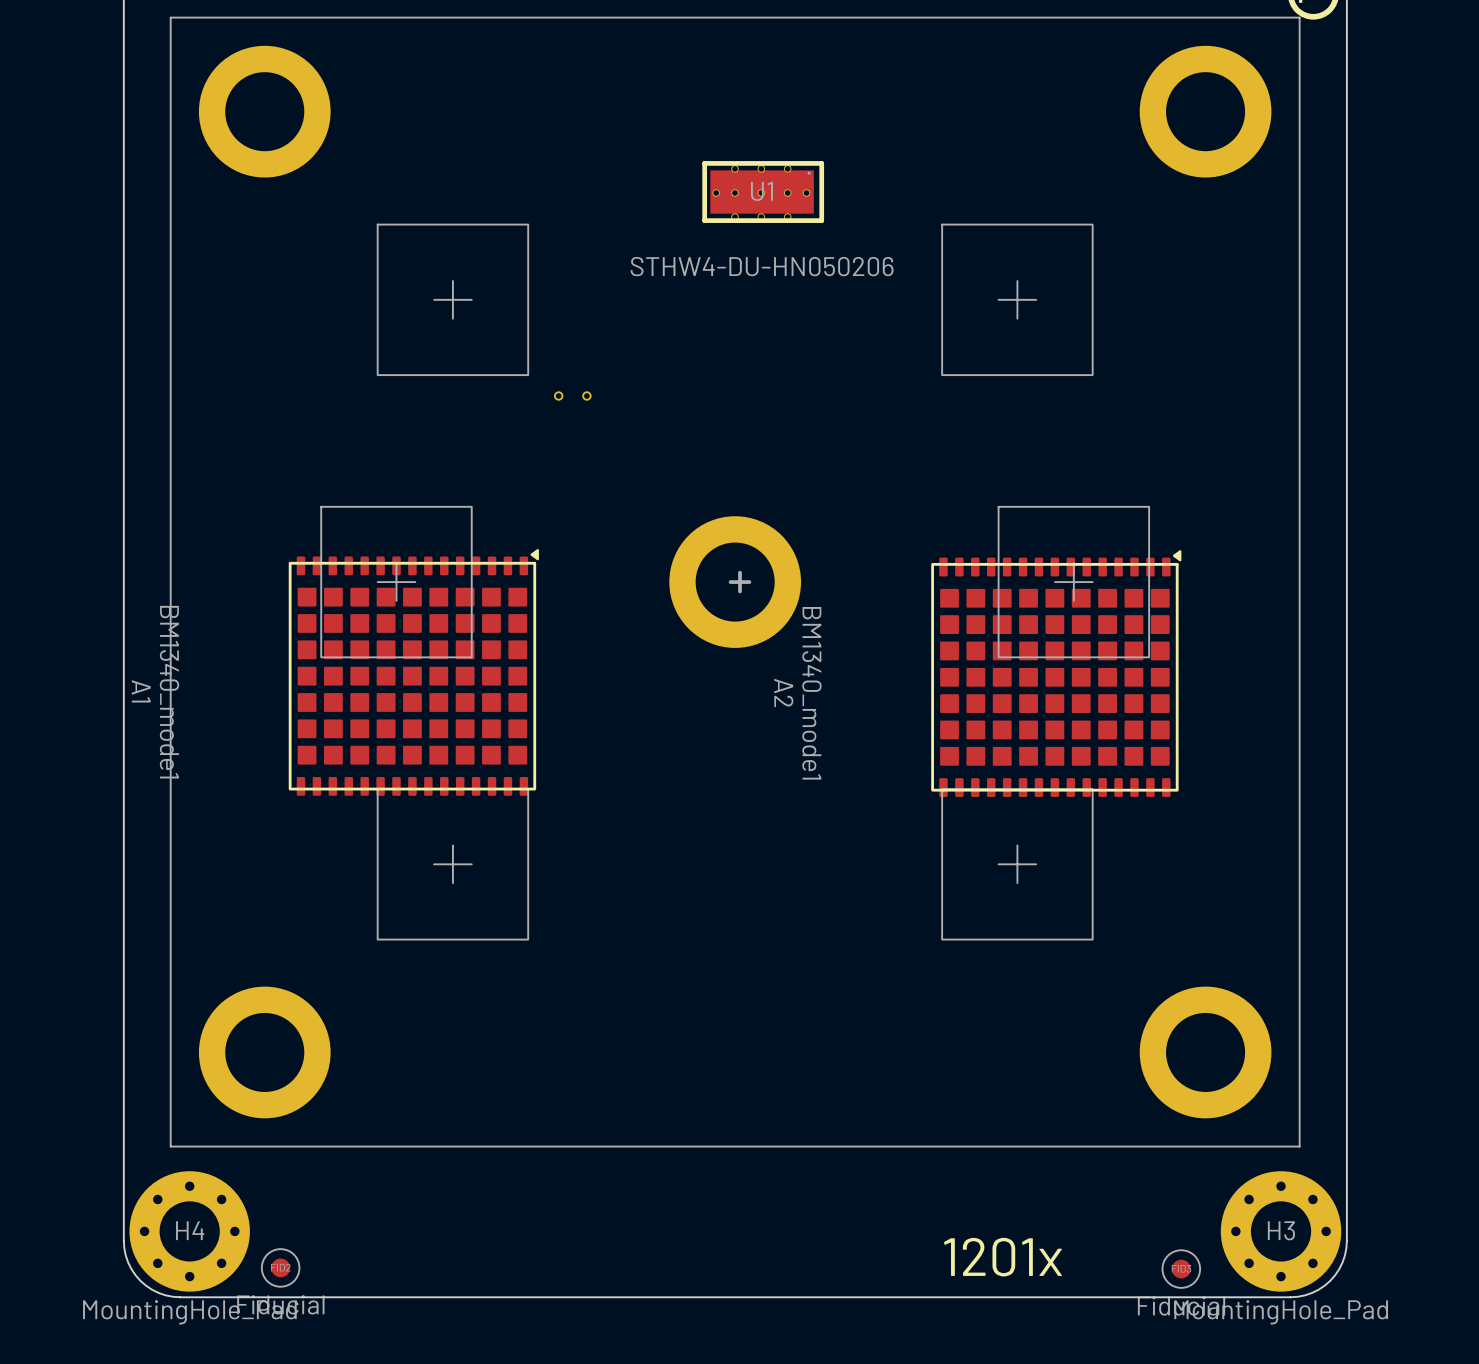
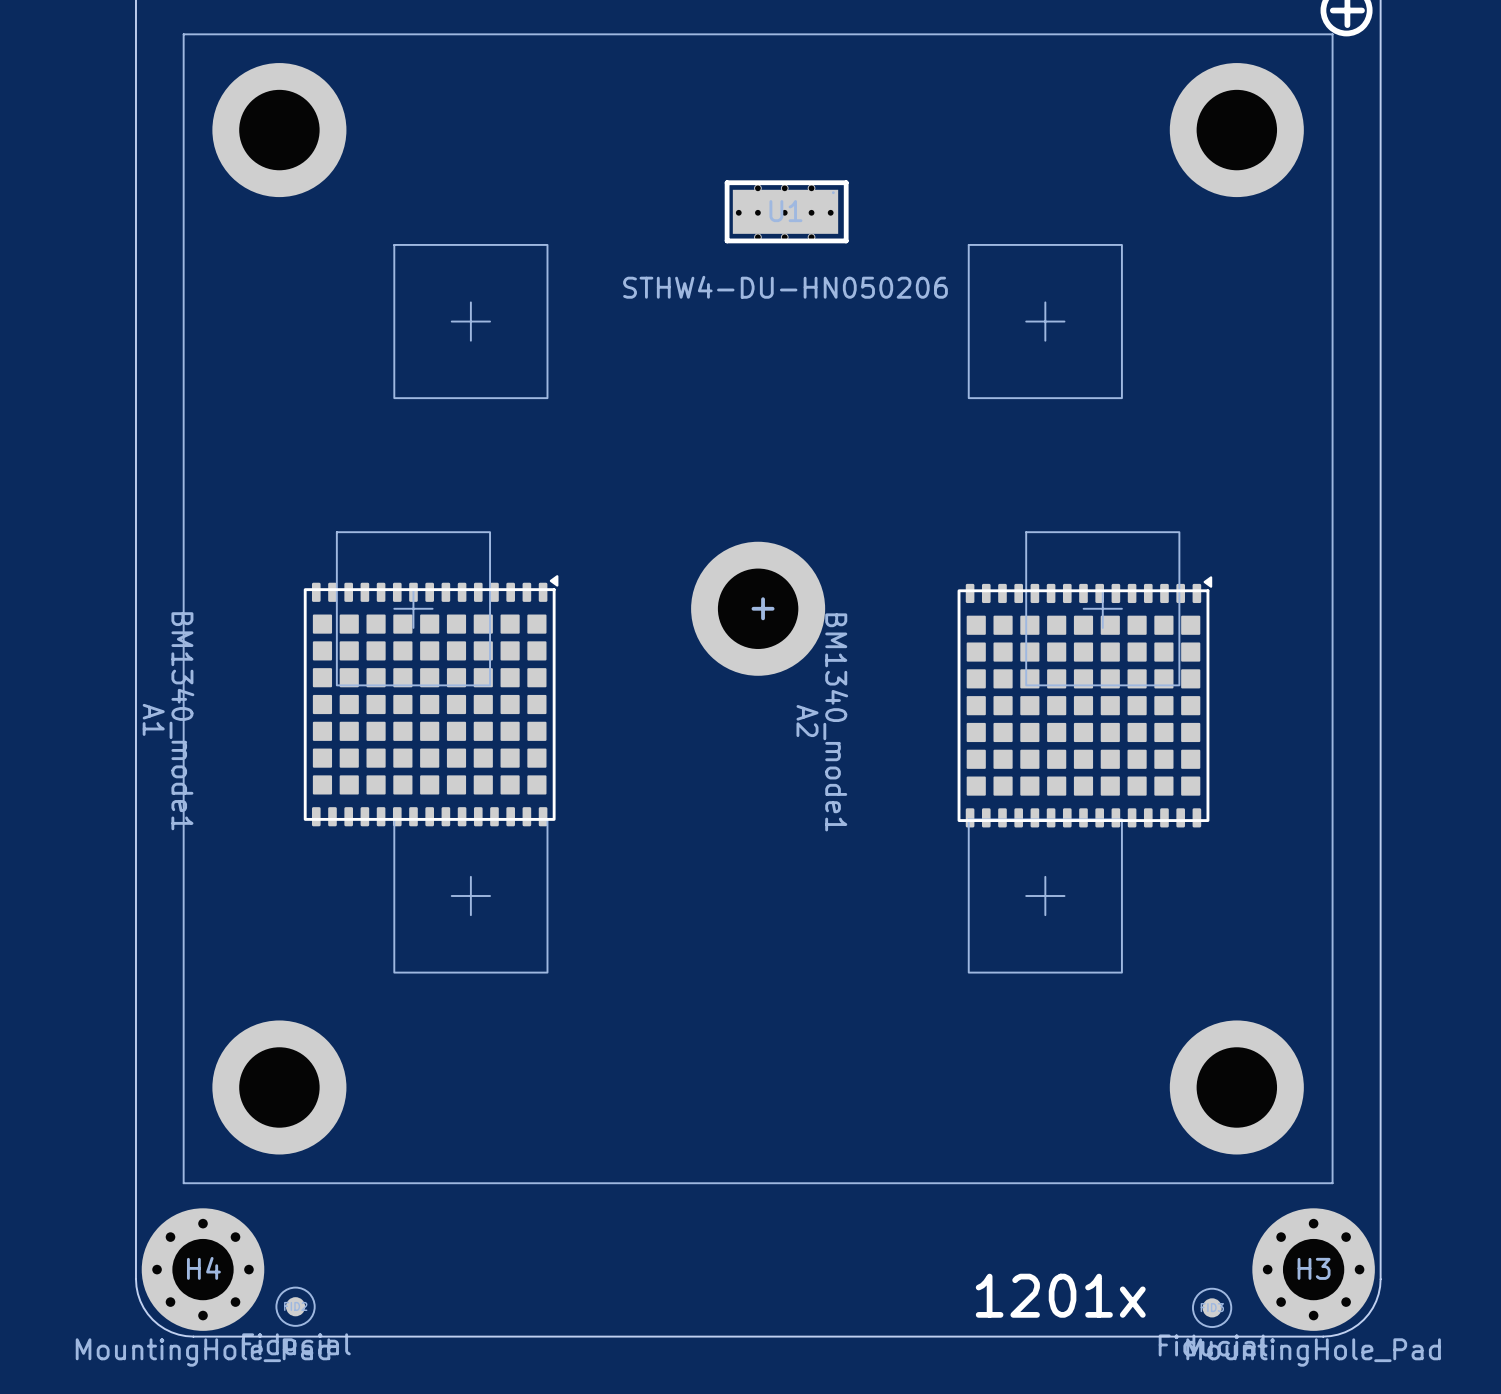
part: (572, 395) -> none

